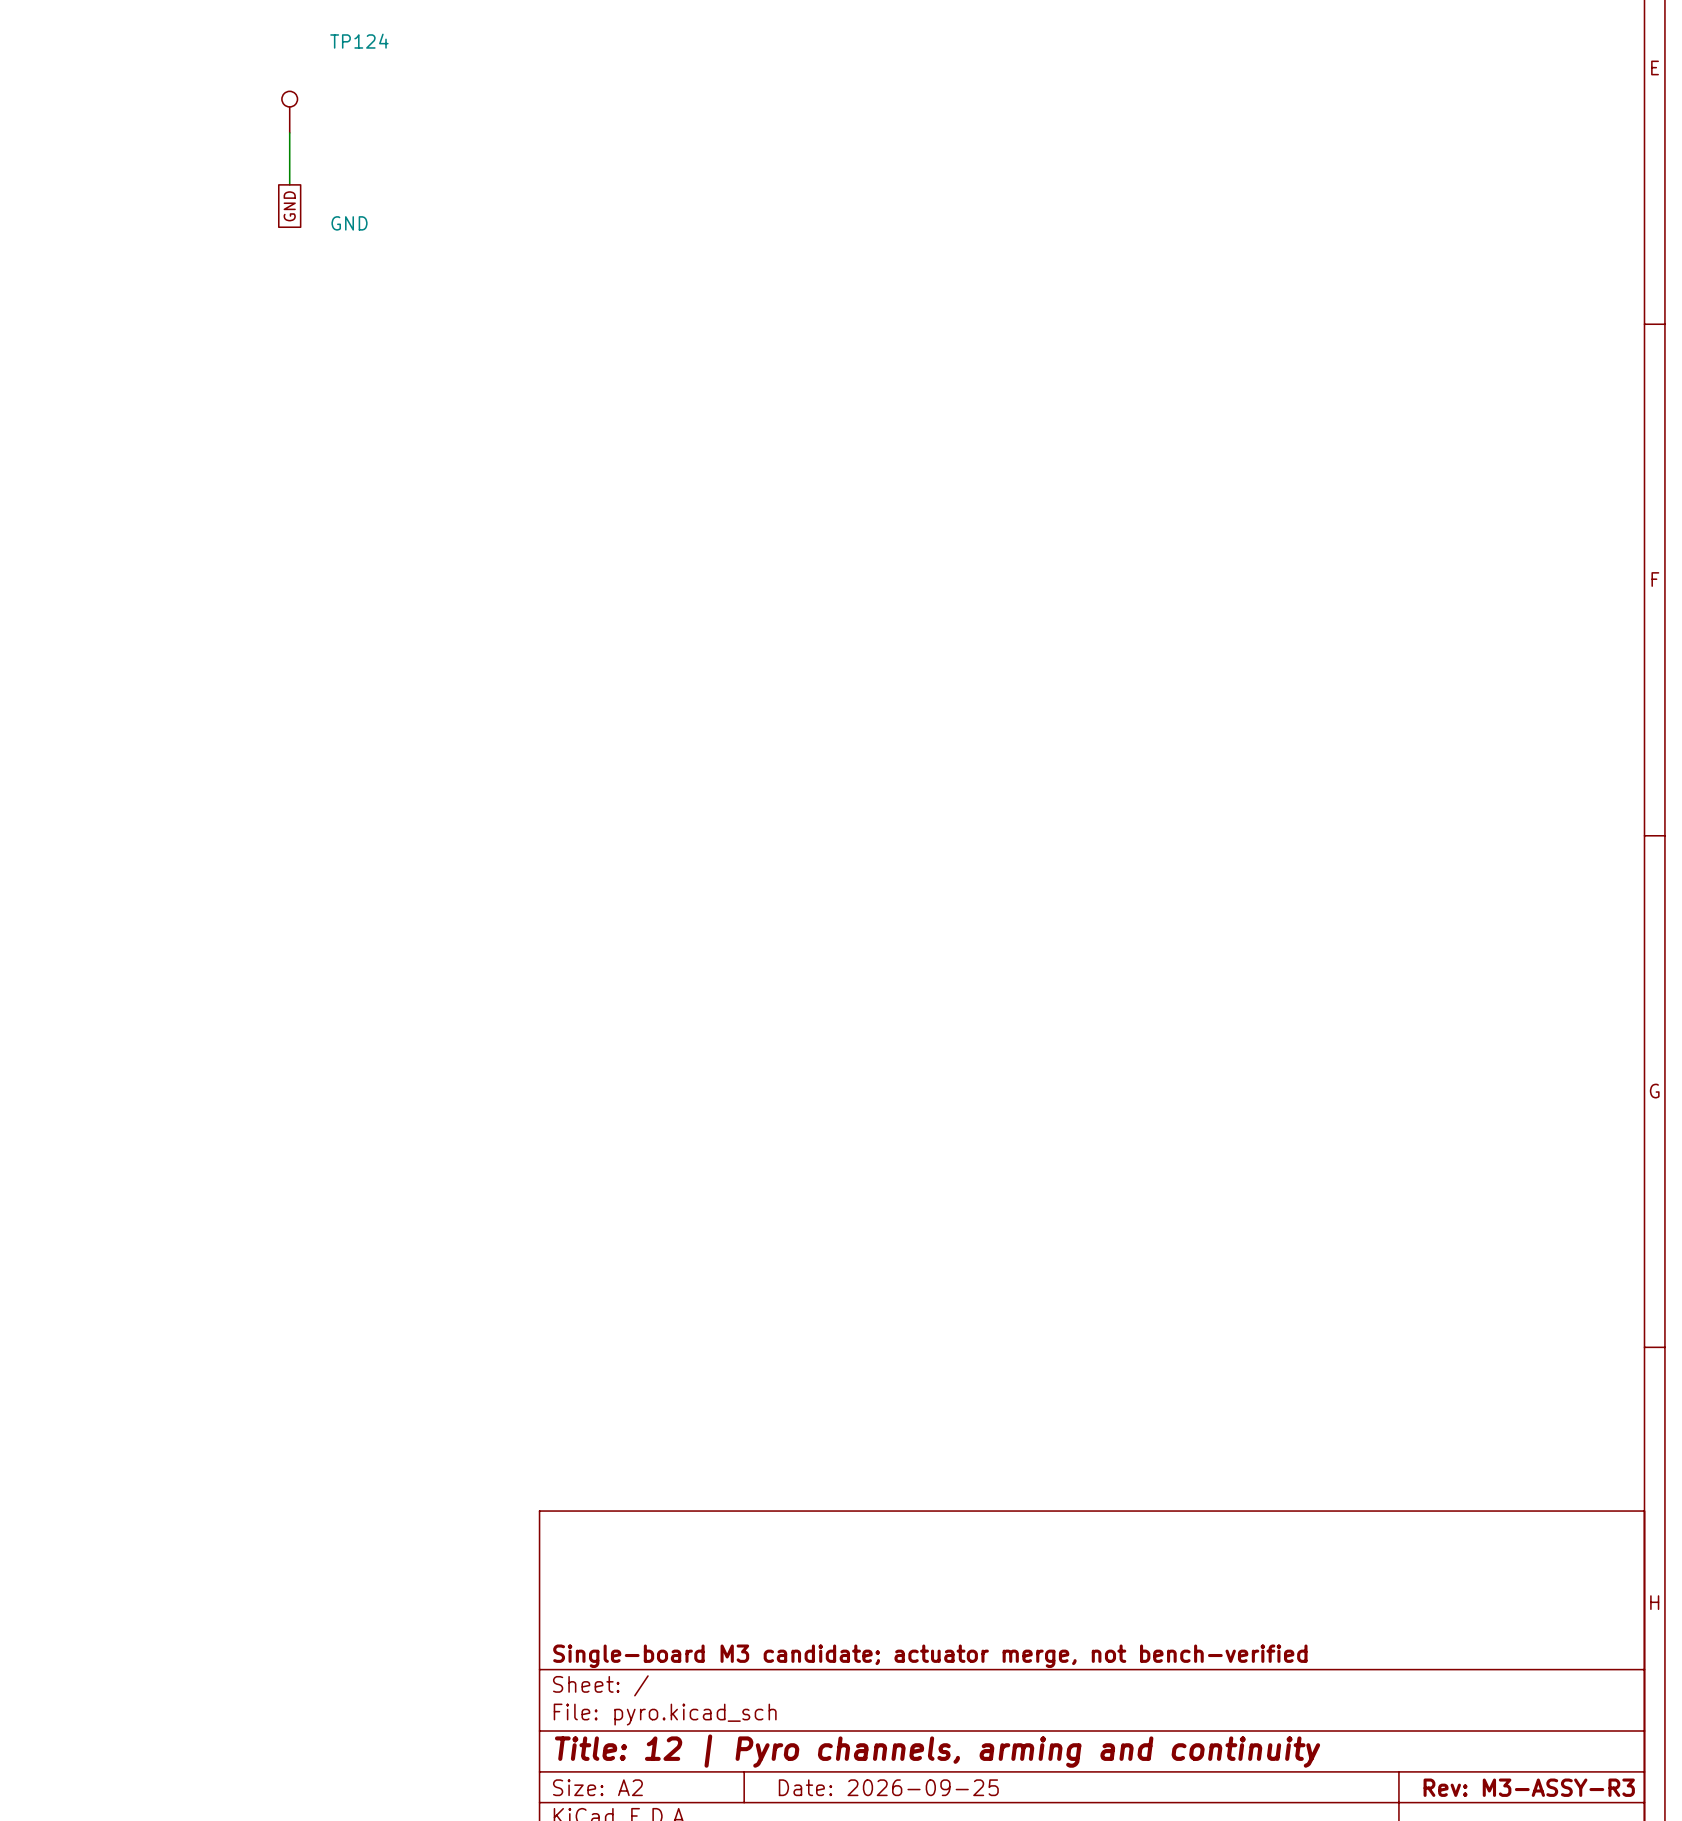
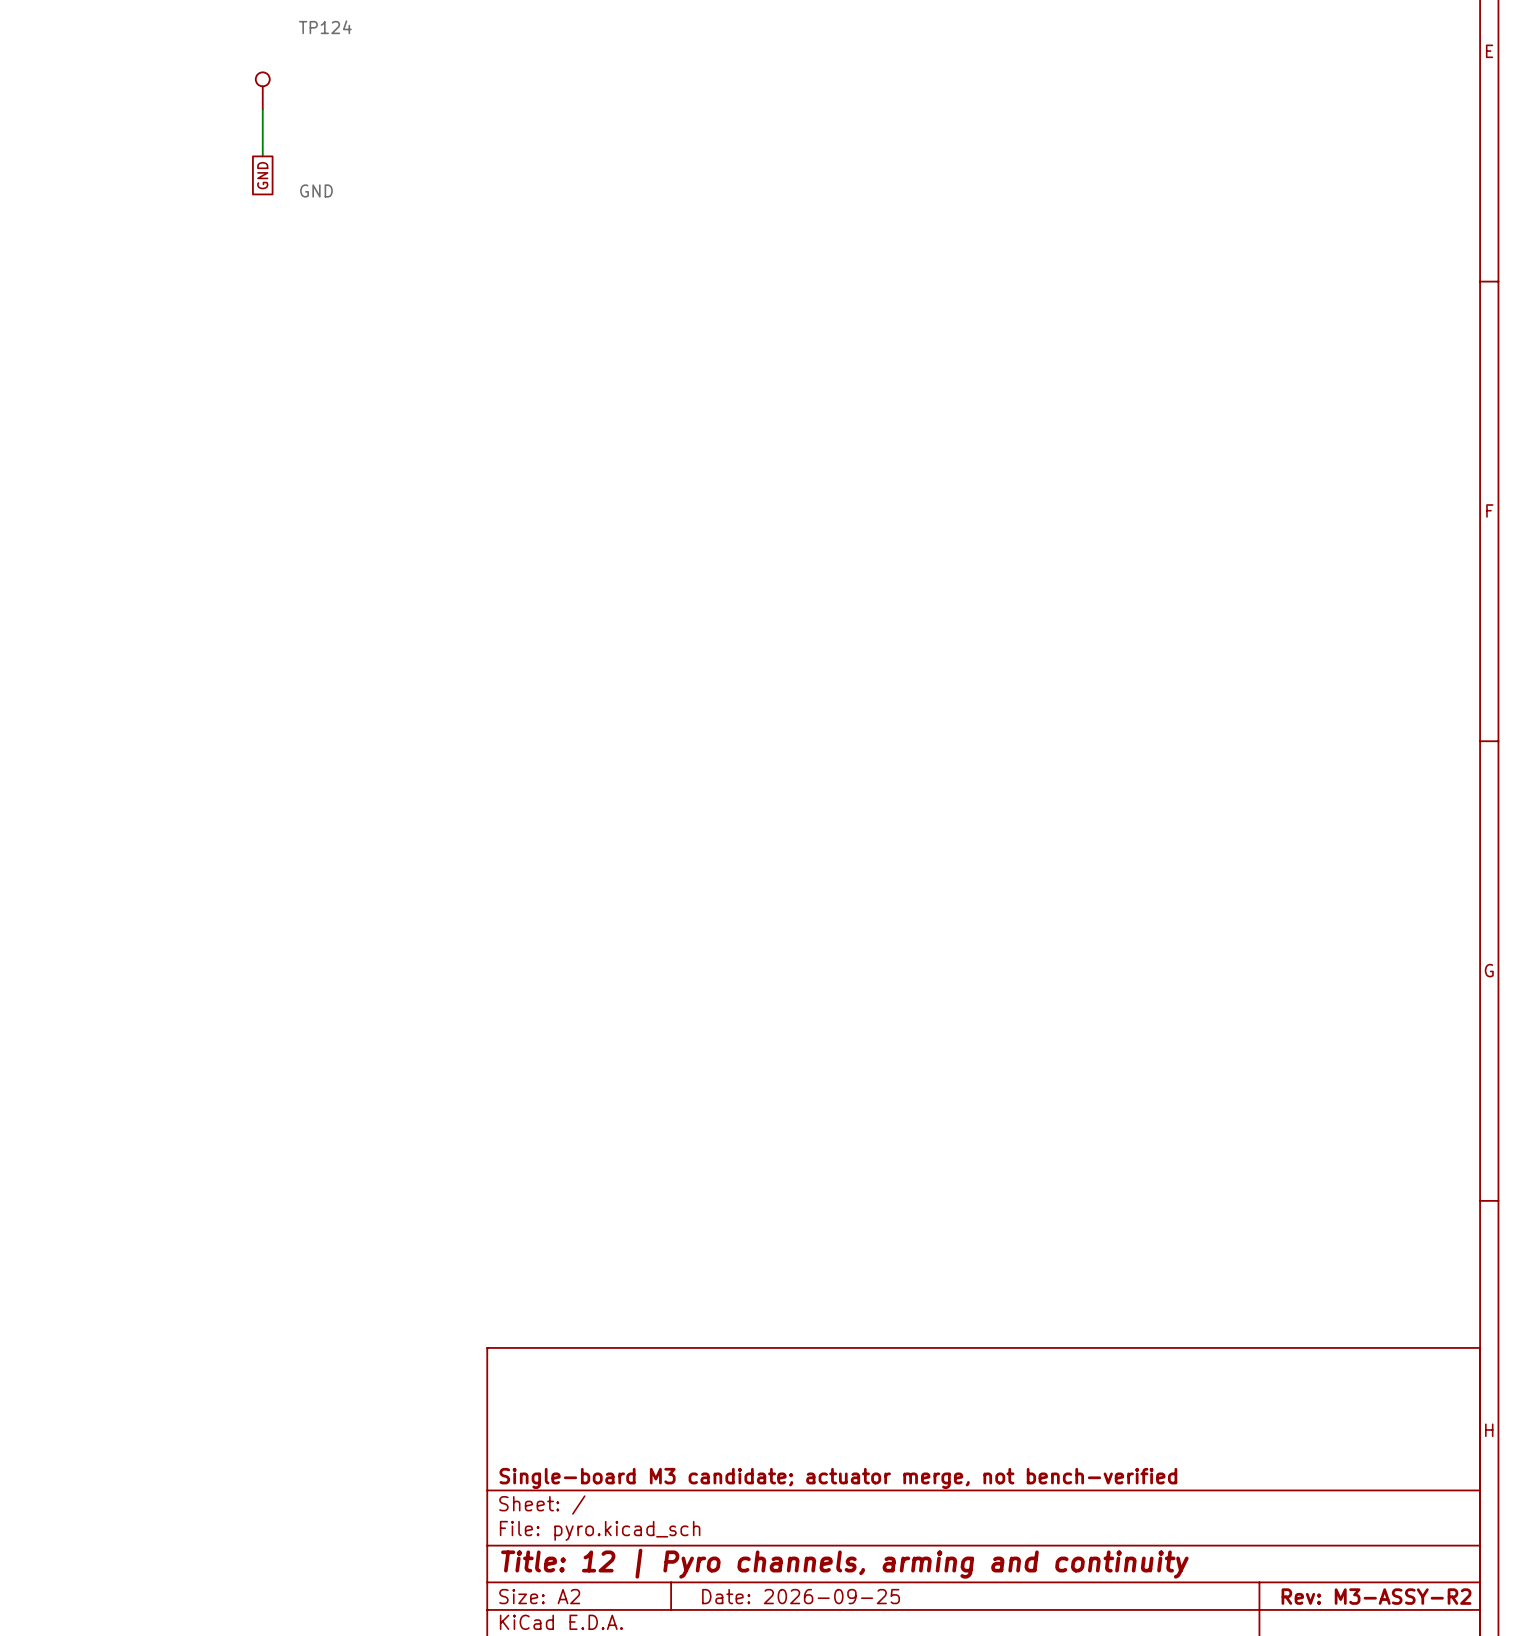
title block: Rev: M3-ASSY-R3 (1529, 1787) -> Rev: M3-ASSY-R2 (1376, 1596)

